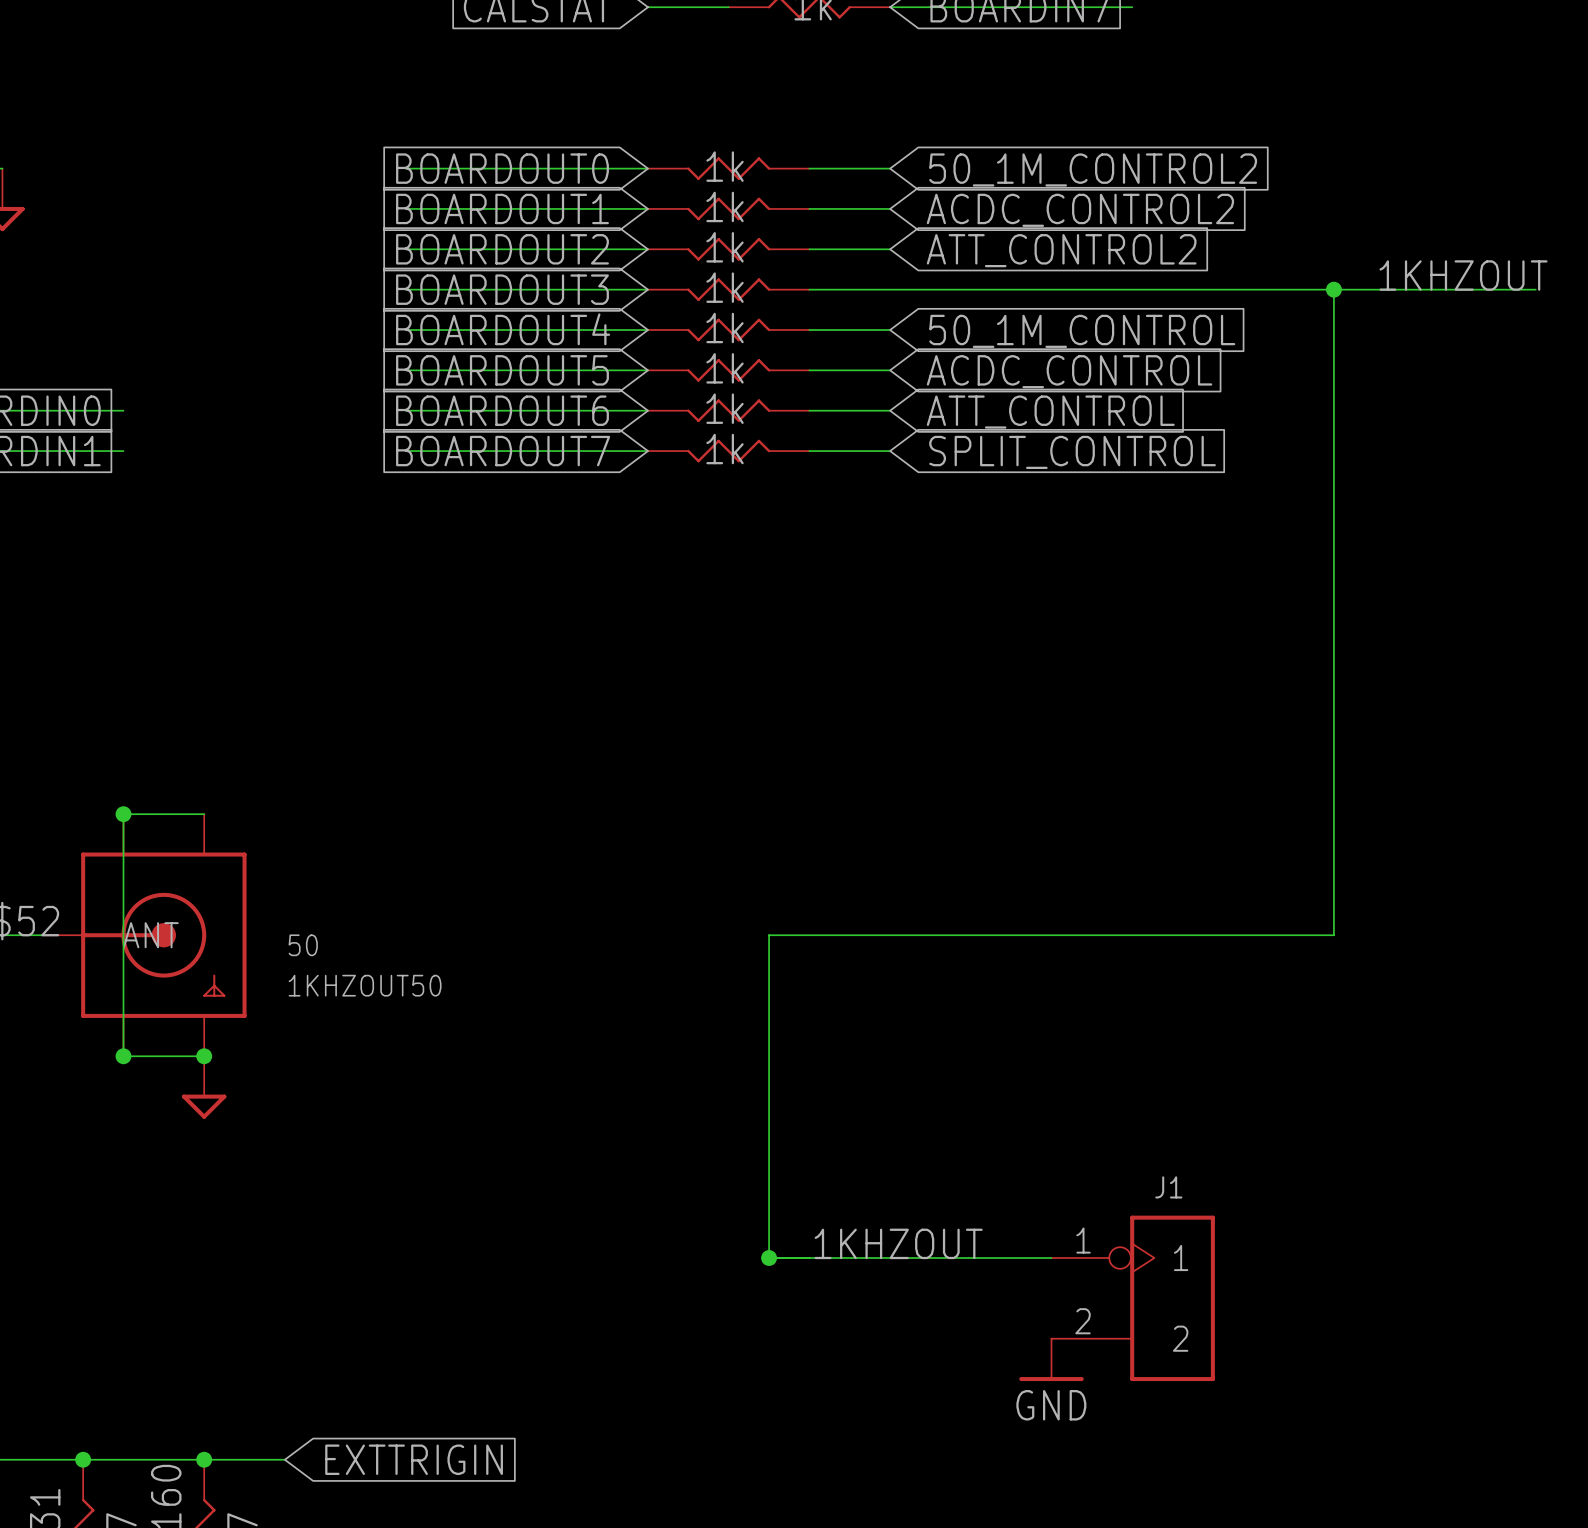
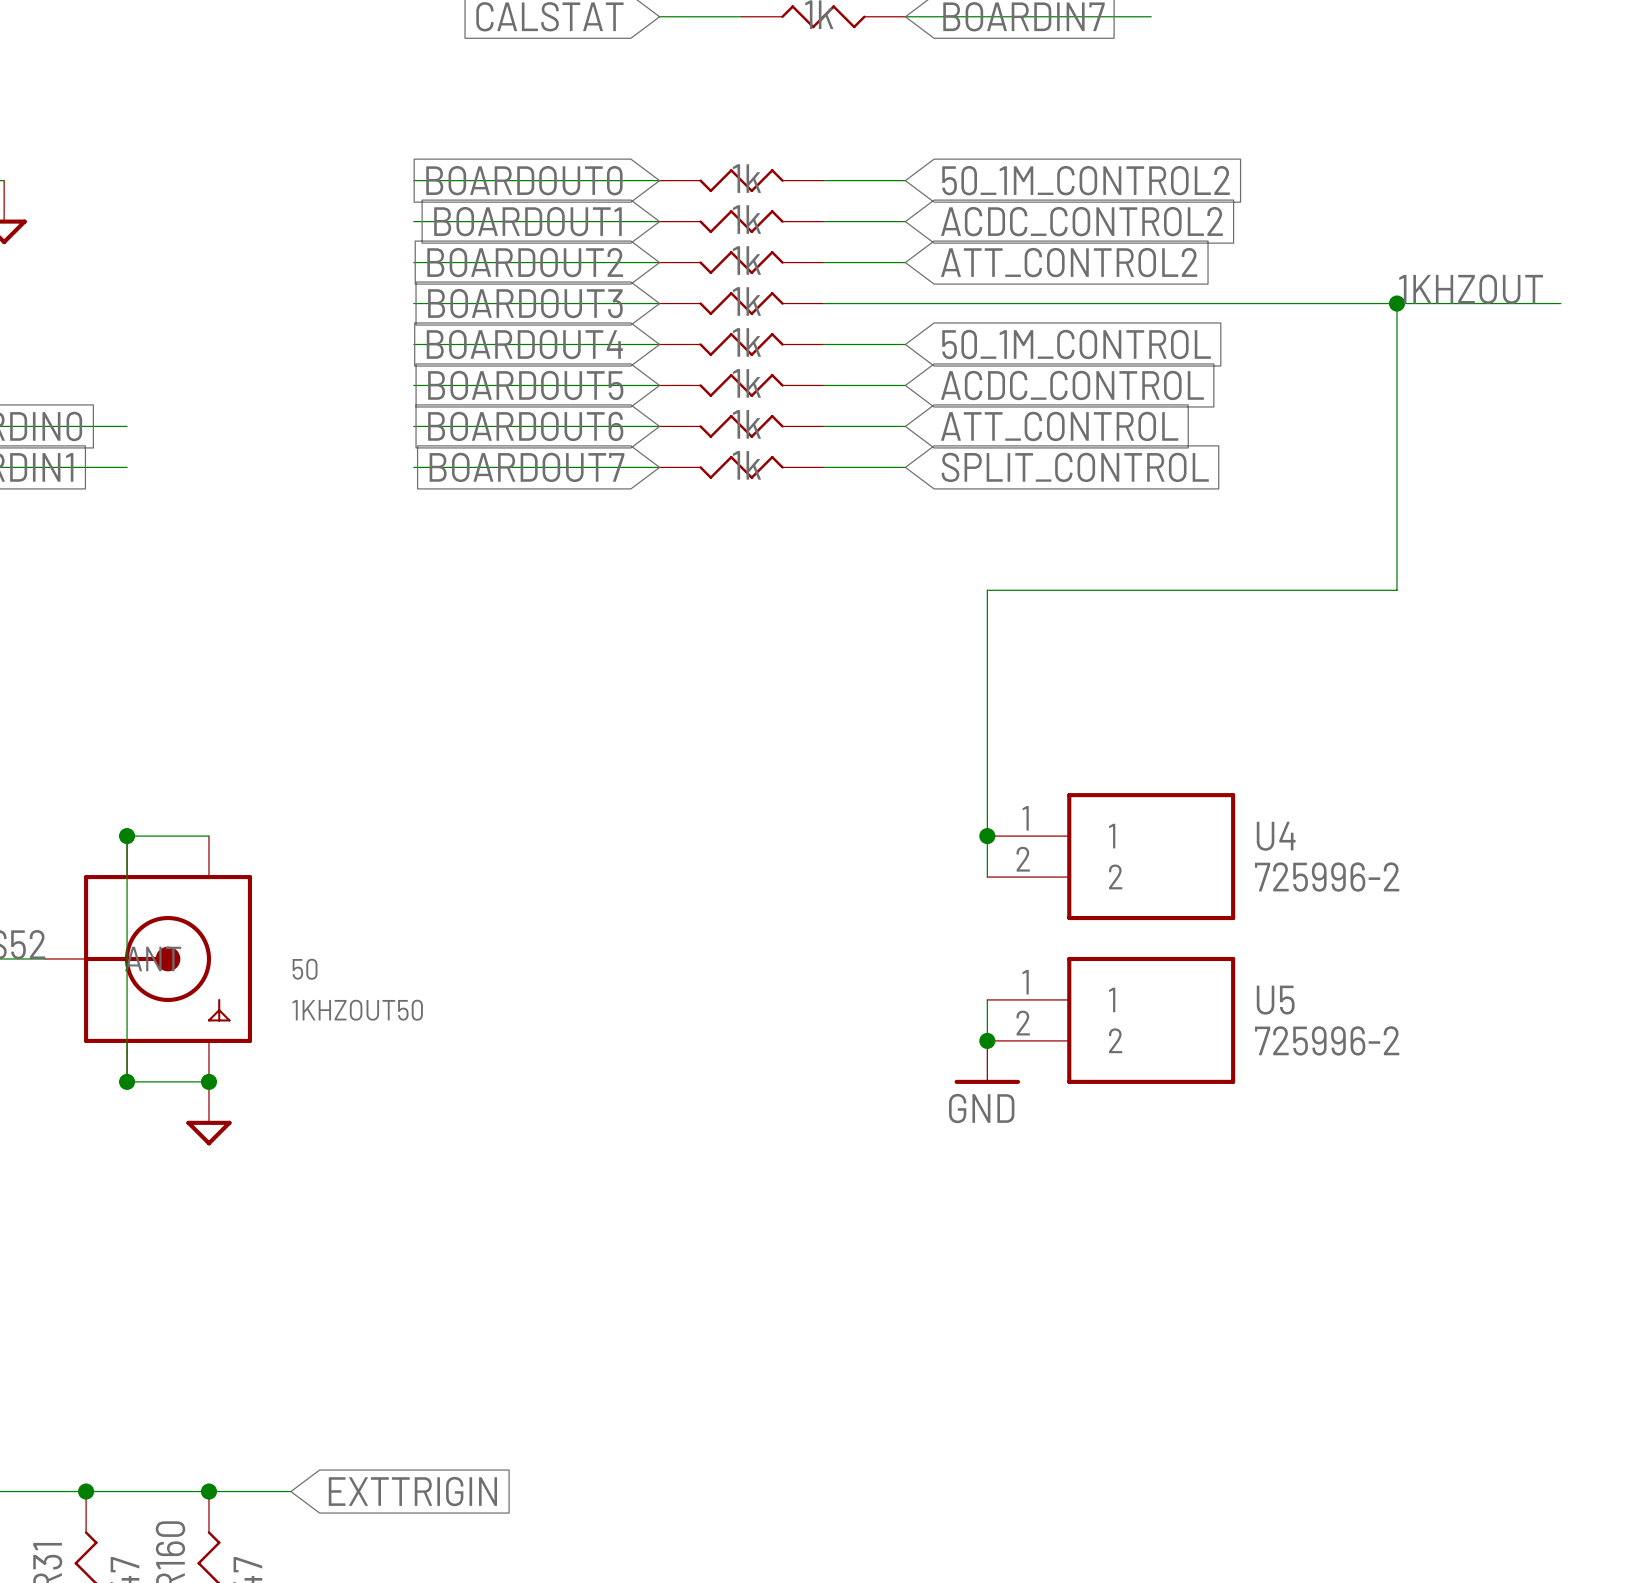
wire: (1333, 289) (1333, 935) (769, 935) (769, 1258) (1051, 1258) -> none
junction position: (1333, 289) -> (1396, 303)
wire: none -> (1396, 303) (1396, 590) (987, 590) (987, 877)
junction: none -> (987, 836)
U4: none -> 725996-2 (1111, 856)
wire: none -> (987, 999) (987, 1040)
U5: none -> 725996-2 (1111, 1020)
junction: none -> (987, 1040)
label: 1KHZOUT (898, 1243) -> none
junction: (769, 1258) -> none
J1: (1133, 1298) -> none
power symbol position: GND (1051, 1359) -> GND (987, 1062)

